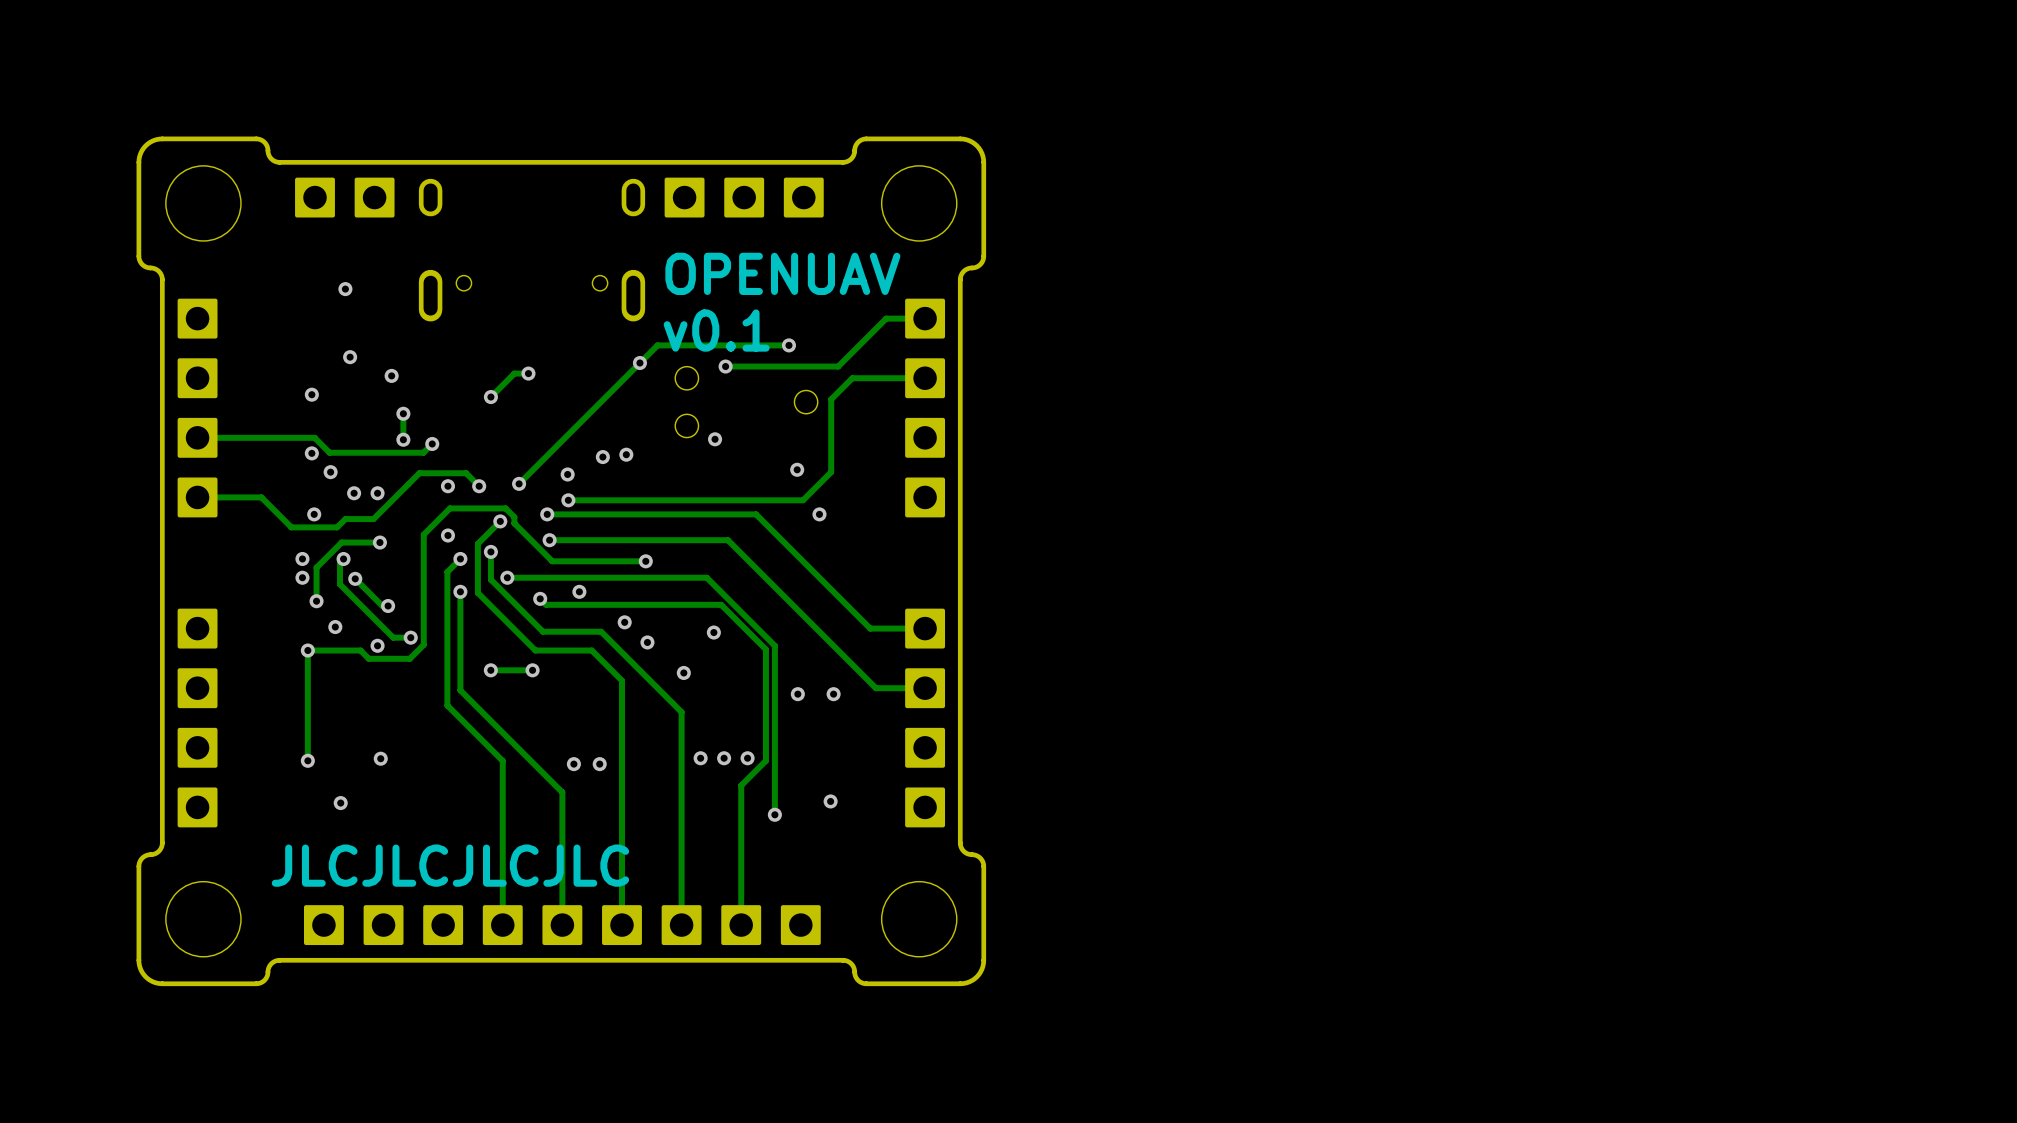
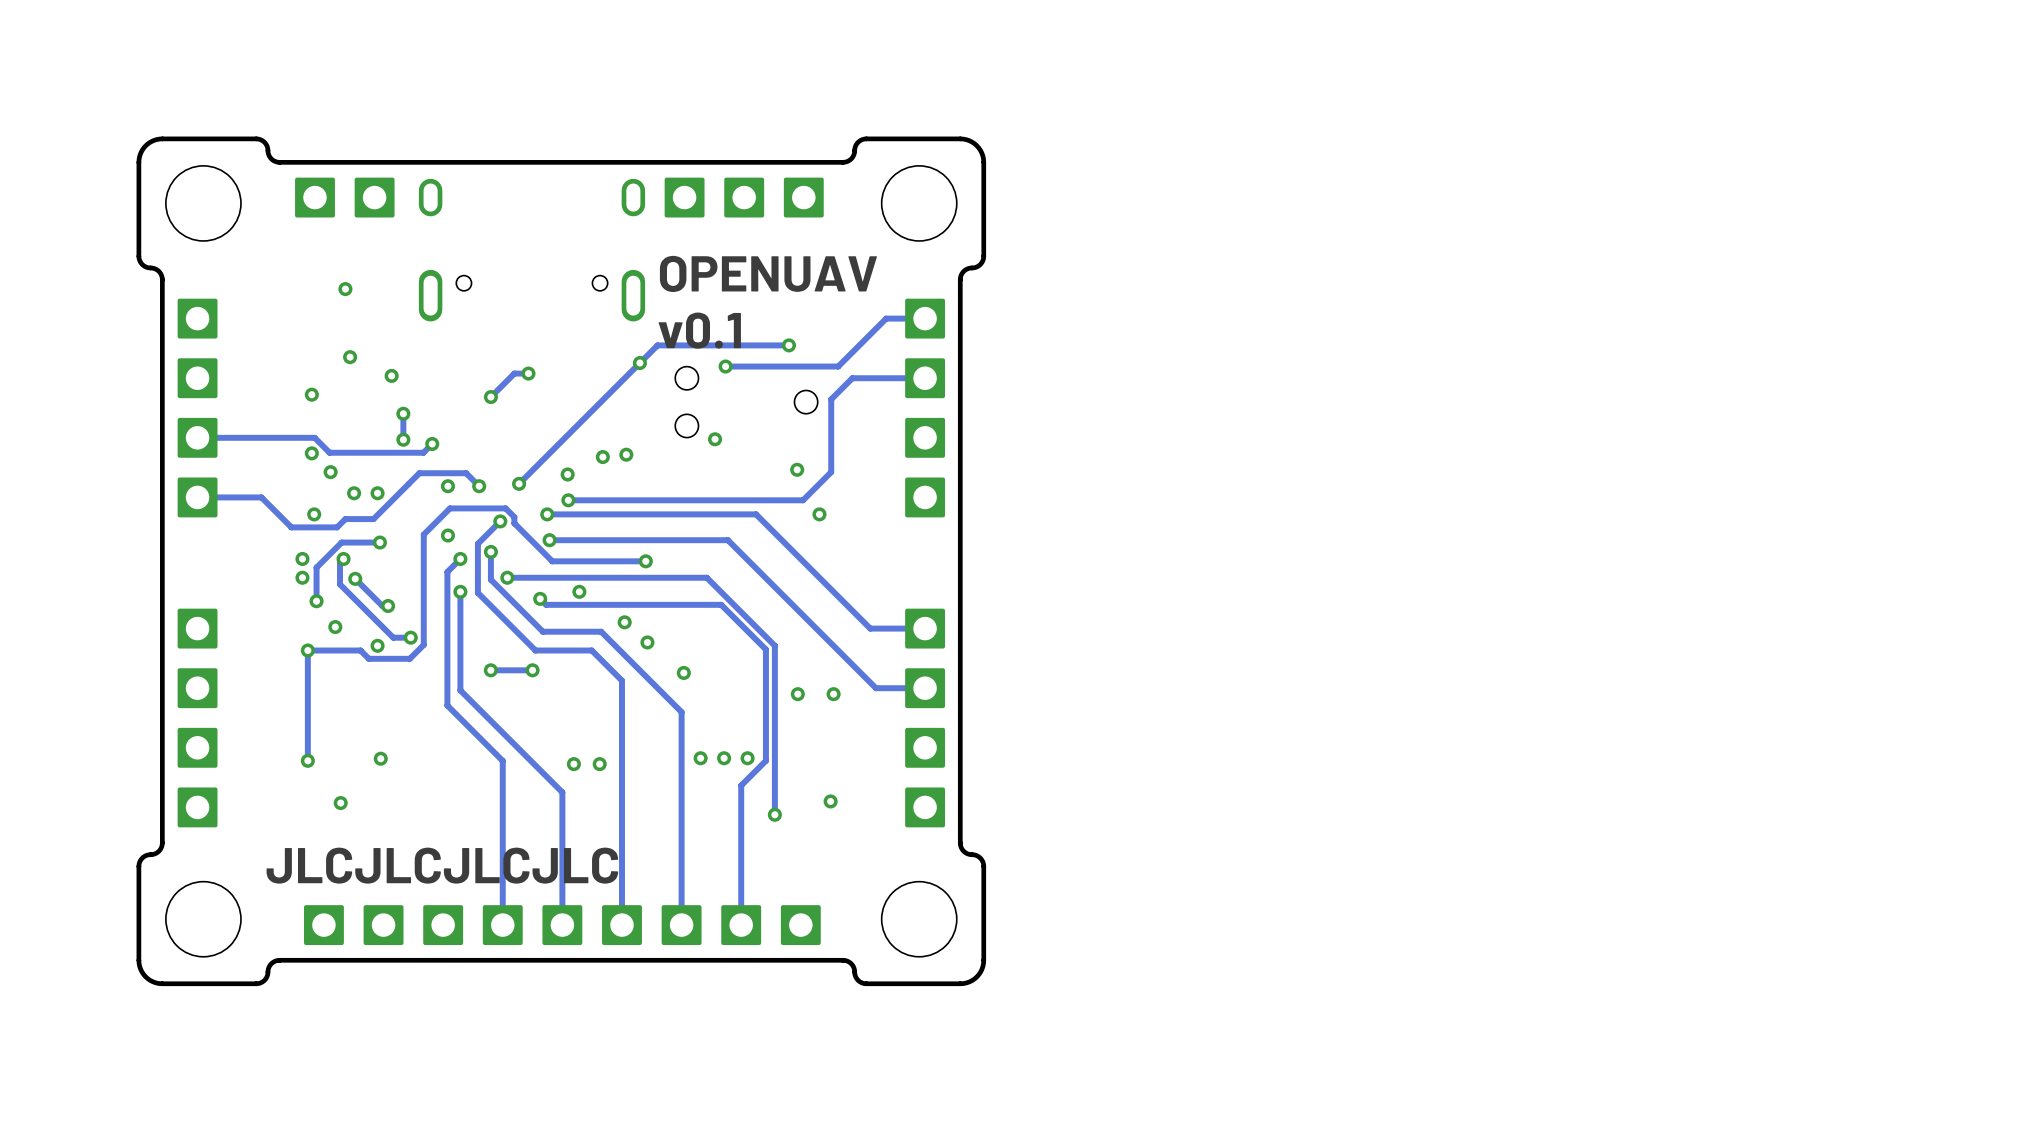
via: (713, 632) -> none

